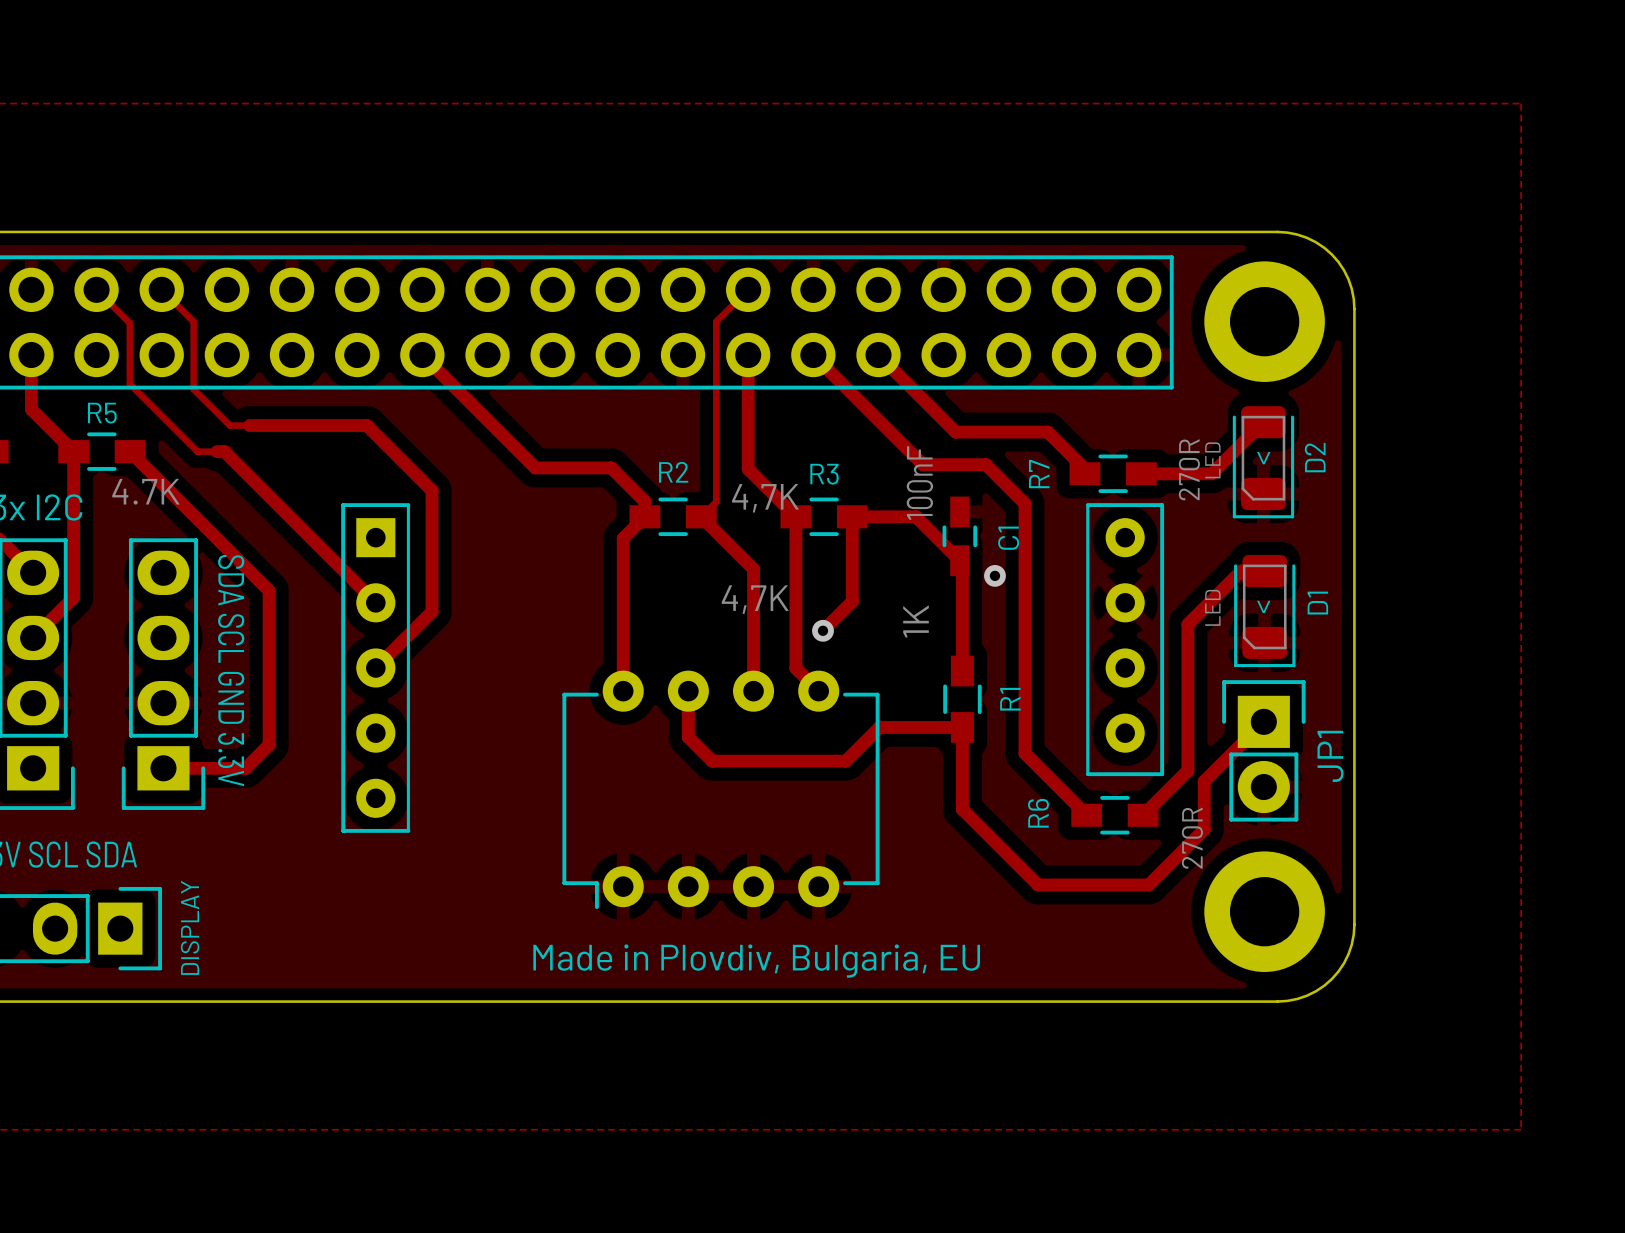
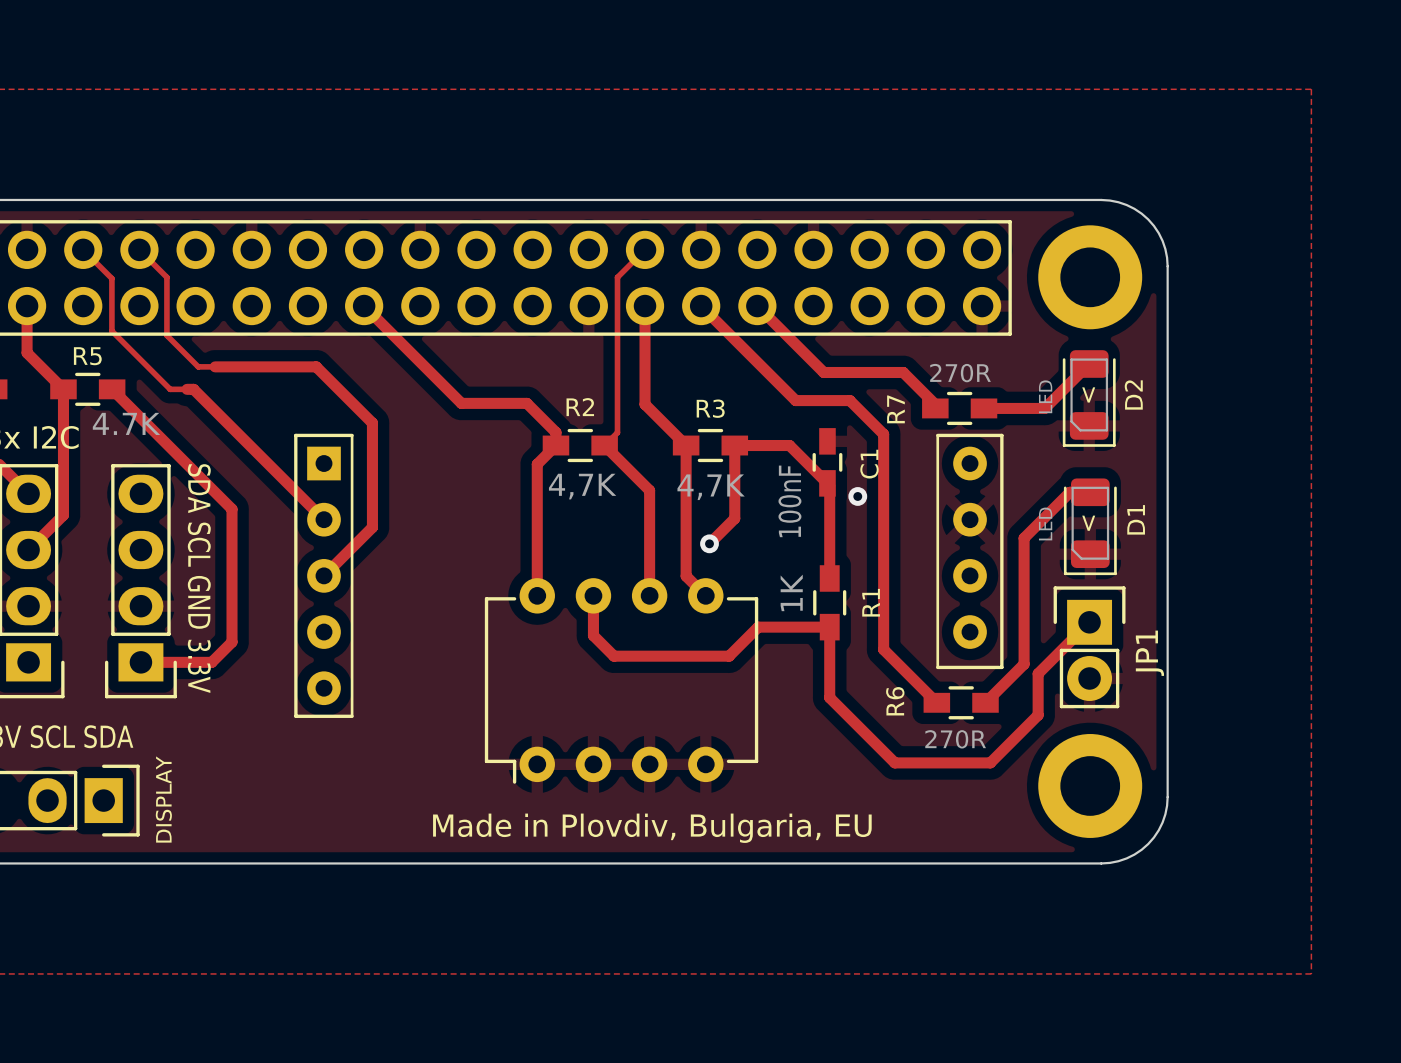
R7 value rotation: 0° (1189, 469) -> 90° clockwise (960, 373)
text position: 100nF (919, 483) -> 100nF (789, 501)
text: 4,7K (765, 498) -> none
text: none -> 4,7K (582, 486)
text: none -> 4,7K (711, 487)
text: 4,7K (755, 599) -> none
text position: 1K (916, 621) -> 1K (791, 592)
R6 value rotation: 0° (1192, 838) -> 90° clockwise (955, 739)

